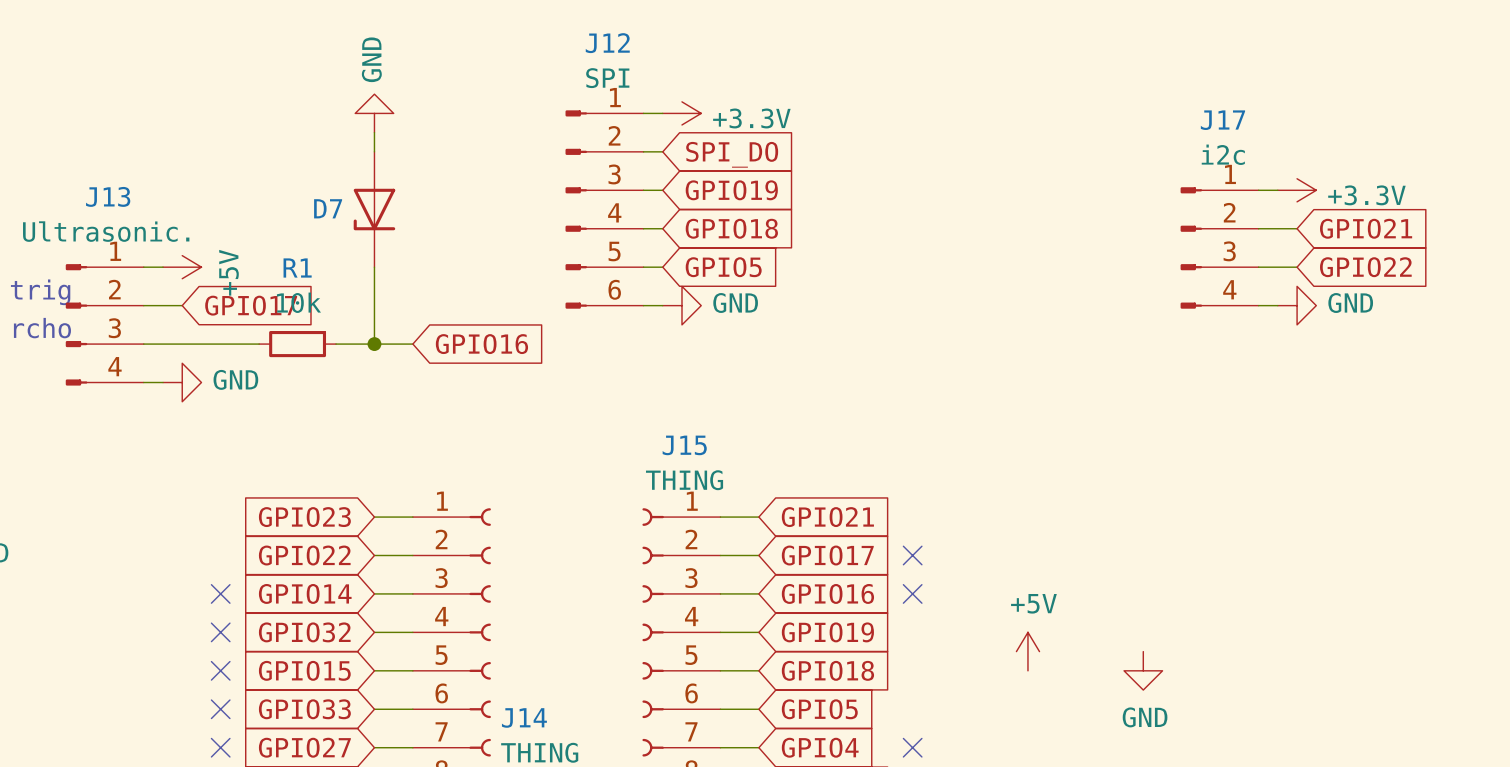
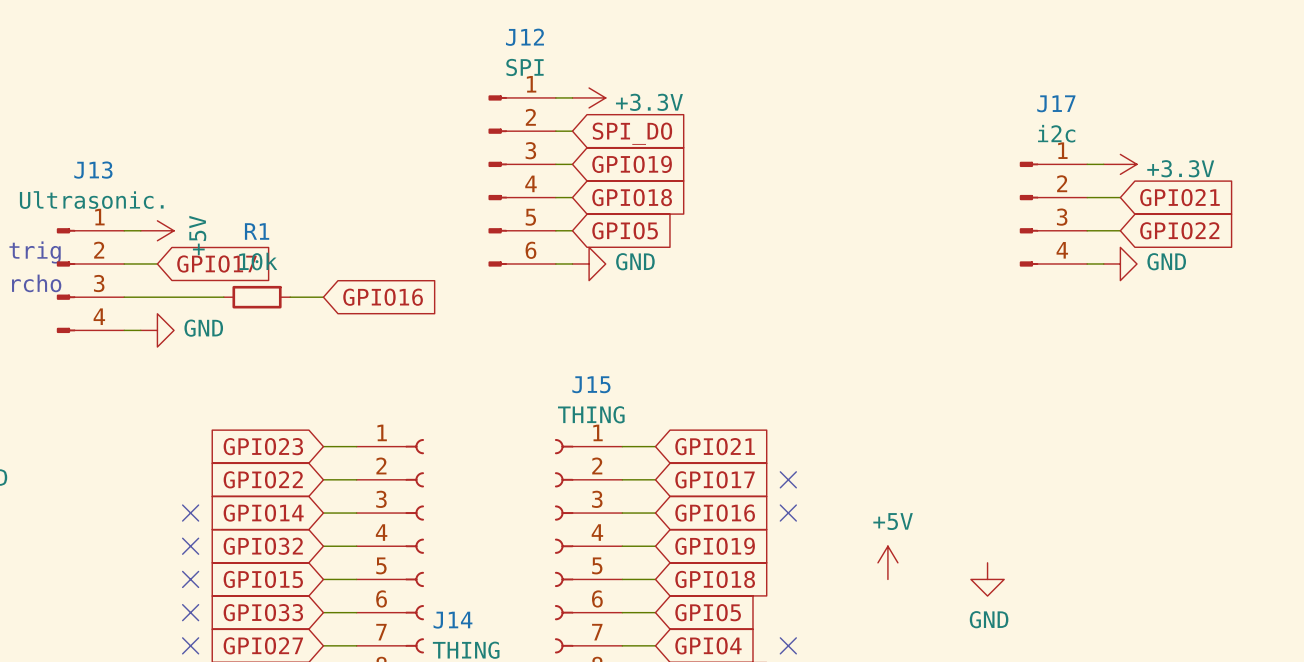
power symbol: GND (374, 113) -> none
wire: (374, 132) (374, 151) -> none
D7: (374, 209) -> none
wire: (374, 267) (374, 344) (412, 344) -> none
junction: (374, 344) -> none
global label position: GPIO16 (481, 344) -> GPIO16 (383, 297)

